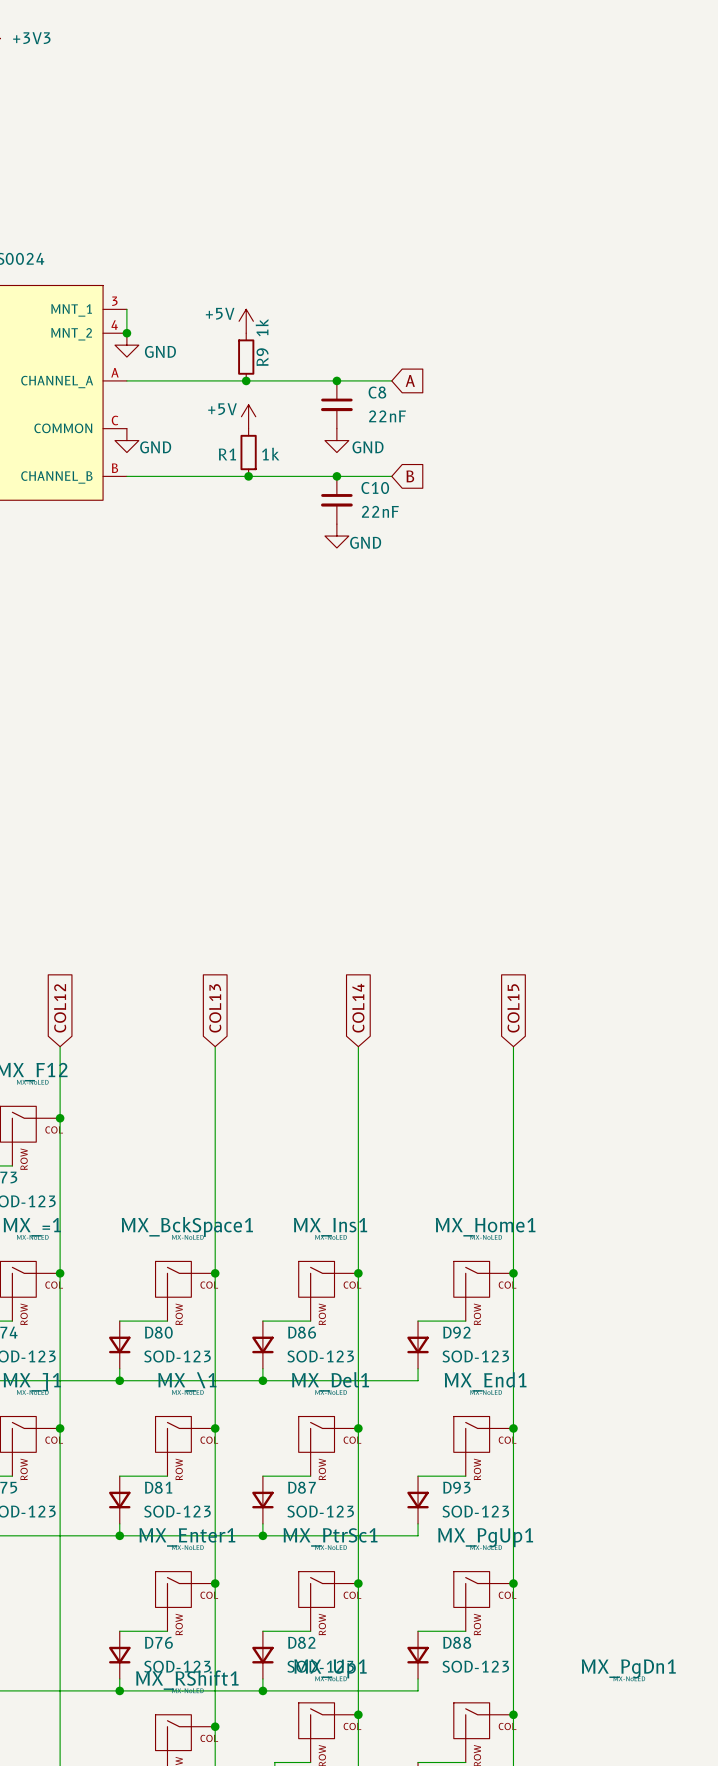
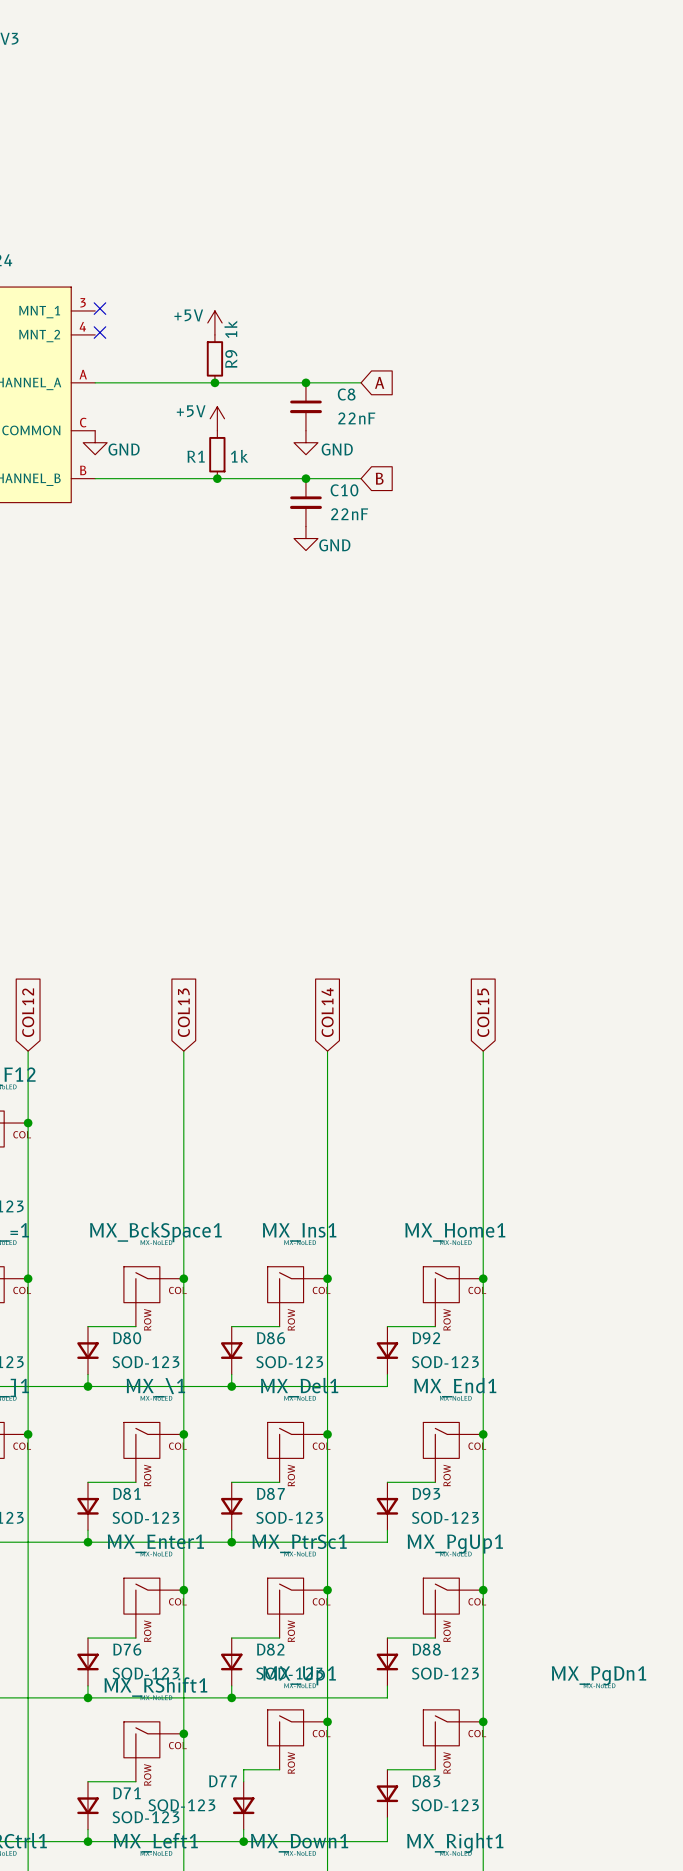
no-connect mark: none -> (99, 308)
wire: (126, 309) (126, 333) -> none
no-connect mark: none -> (99, 332)
junction: (126, 333) -> none
power symbol: GND (126, 345) -> none

